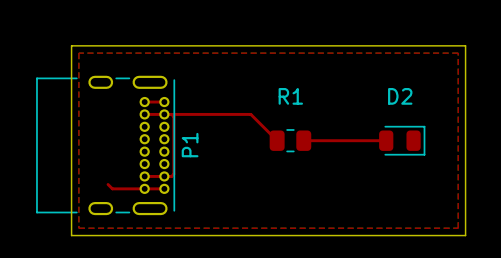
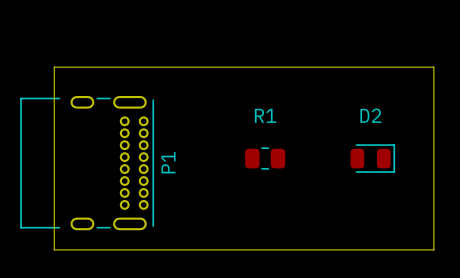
top zone outline: (78, 53) (458, 53) (458, 228) (78, 228) (78, 53) -> none
top track: (144, 102) (164, 102) -> none
top track: (144, 114) (250, 114) (277, 140) -> none
top track: (171, 114) (173, 116) (173, 174) (171, 176) (144, 176) -> none
top track: (303, 140) (386, 140) -> none
top track: (108, 184) (112, 188) (164, 188) -> none

